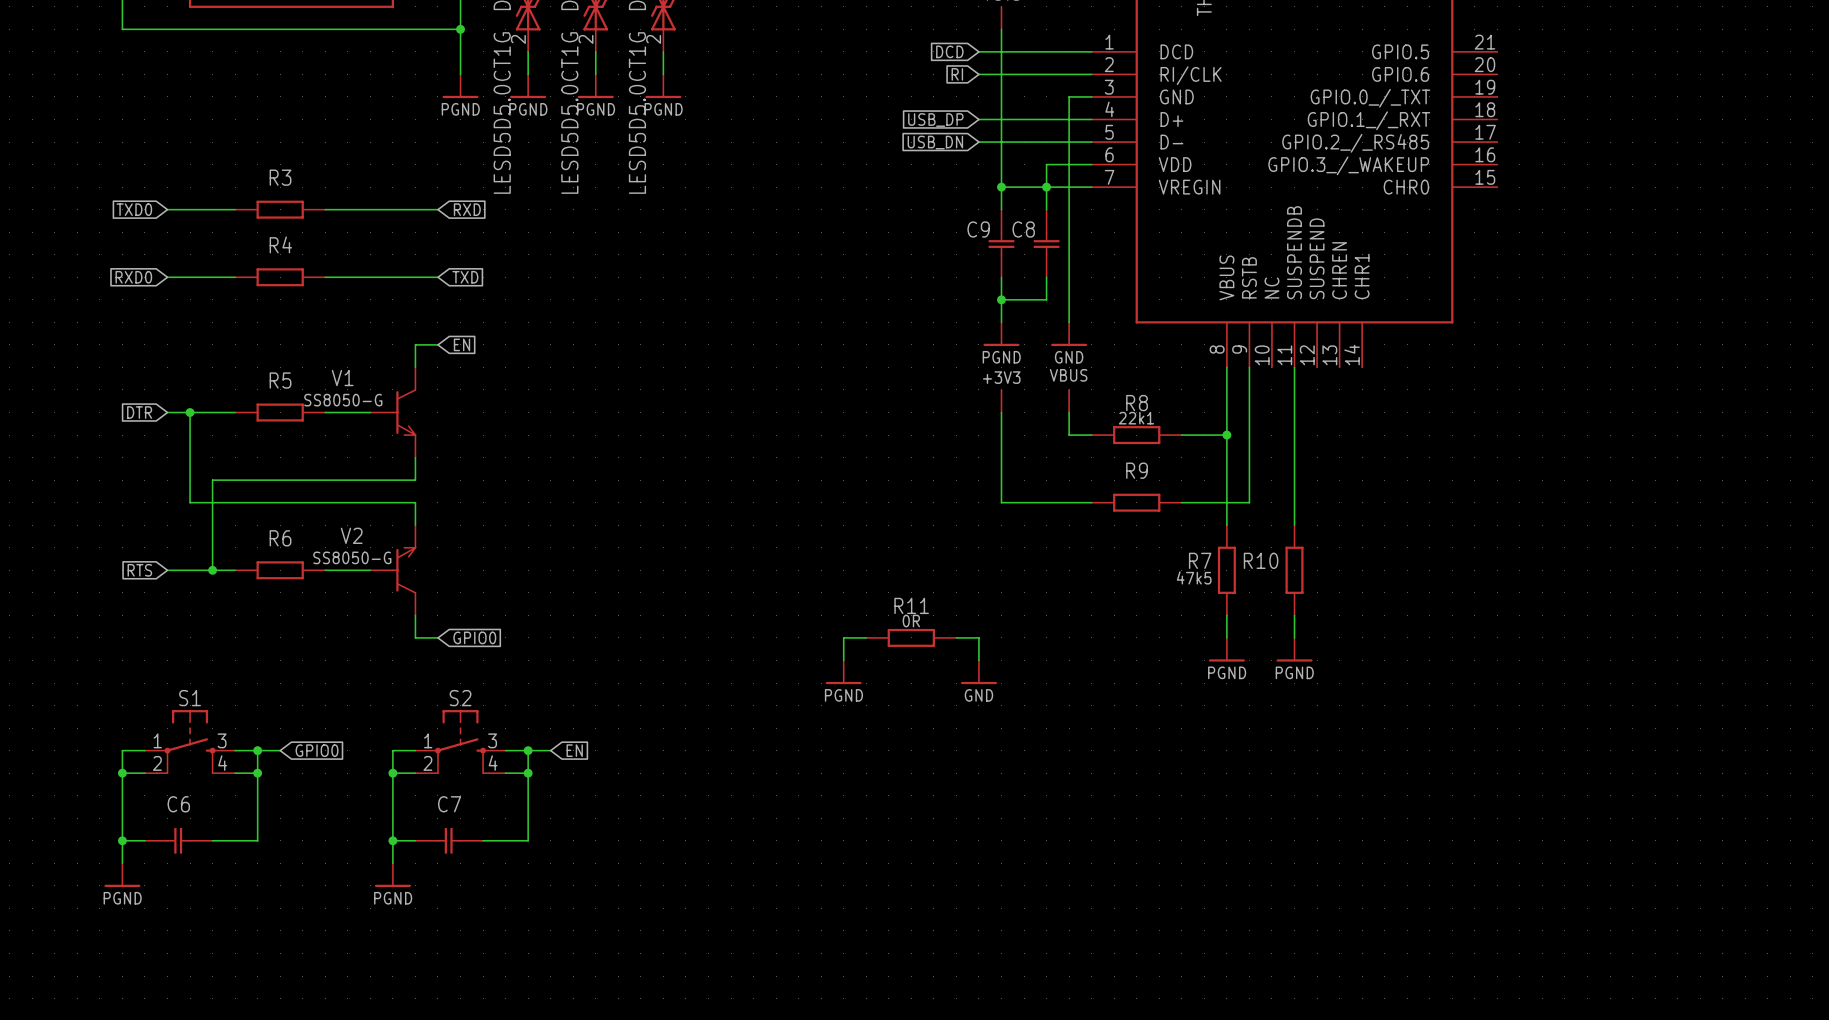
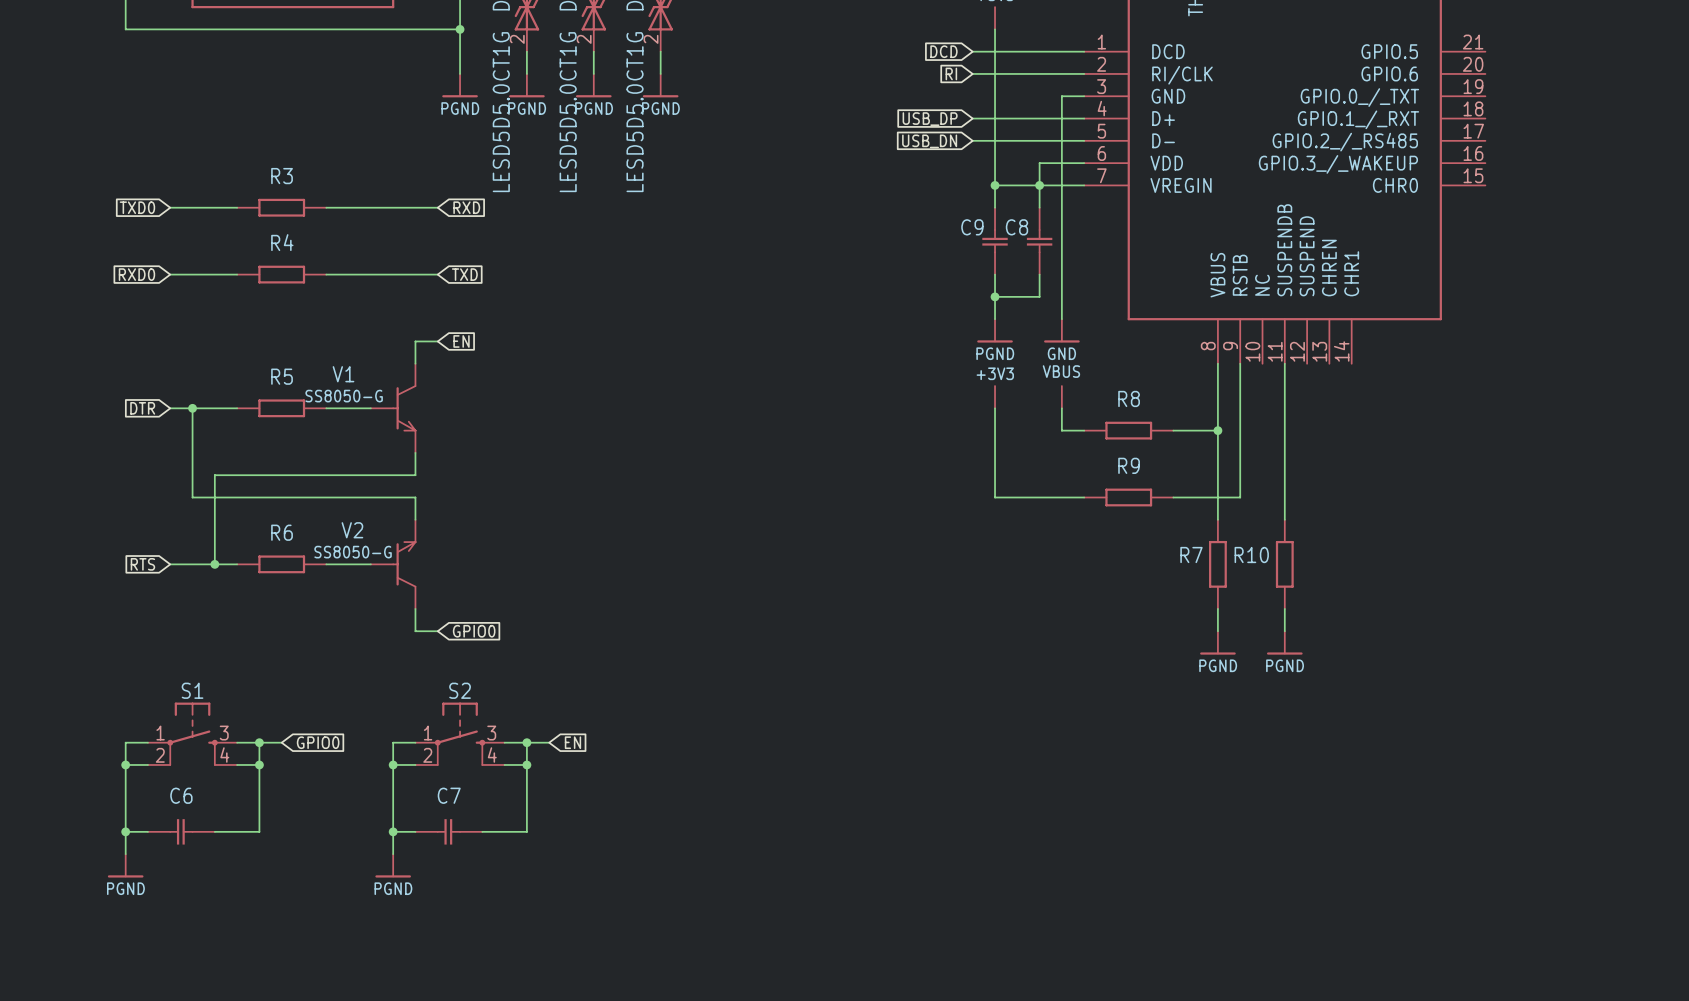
R8 value: 22k1 (1136, 418) -> none
R7 value: 47k5 (1194, 577) -> none
wire: (866, 637) (843, 637) (843, 660) -> none
R11: 0R (911, 637) -> none
wire: (956, 637) (978, 637) (978, 660) -> none
power symbol: PGND (843, 672) -> none
power symbol: GND (978, 672) -> none

